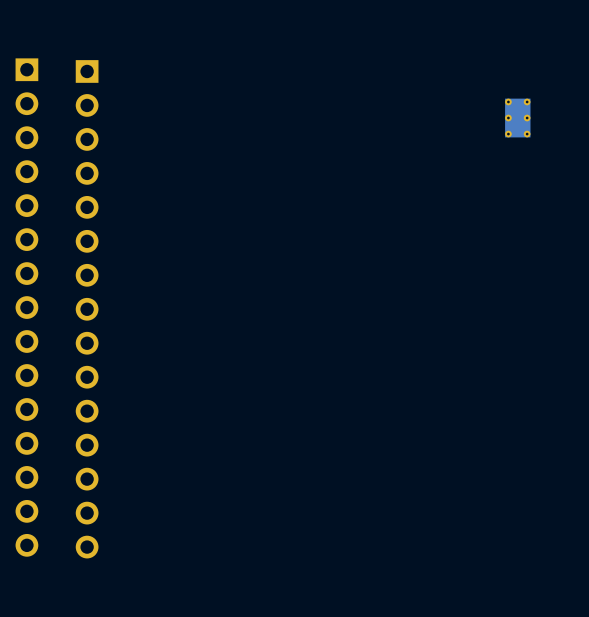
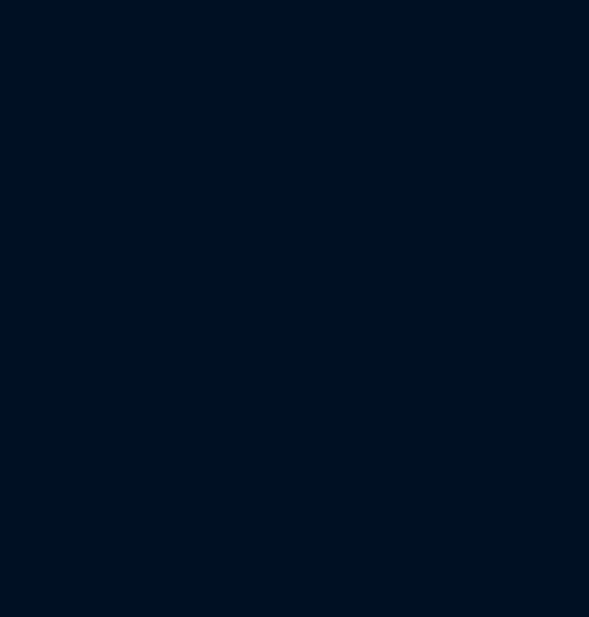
part: (517, 118) -> none
part: (26, 307) -> none
part: (87, 309) -> none

